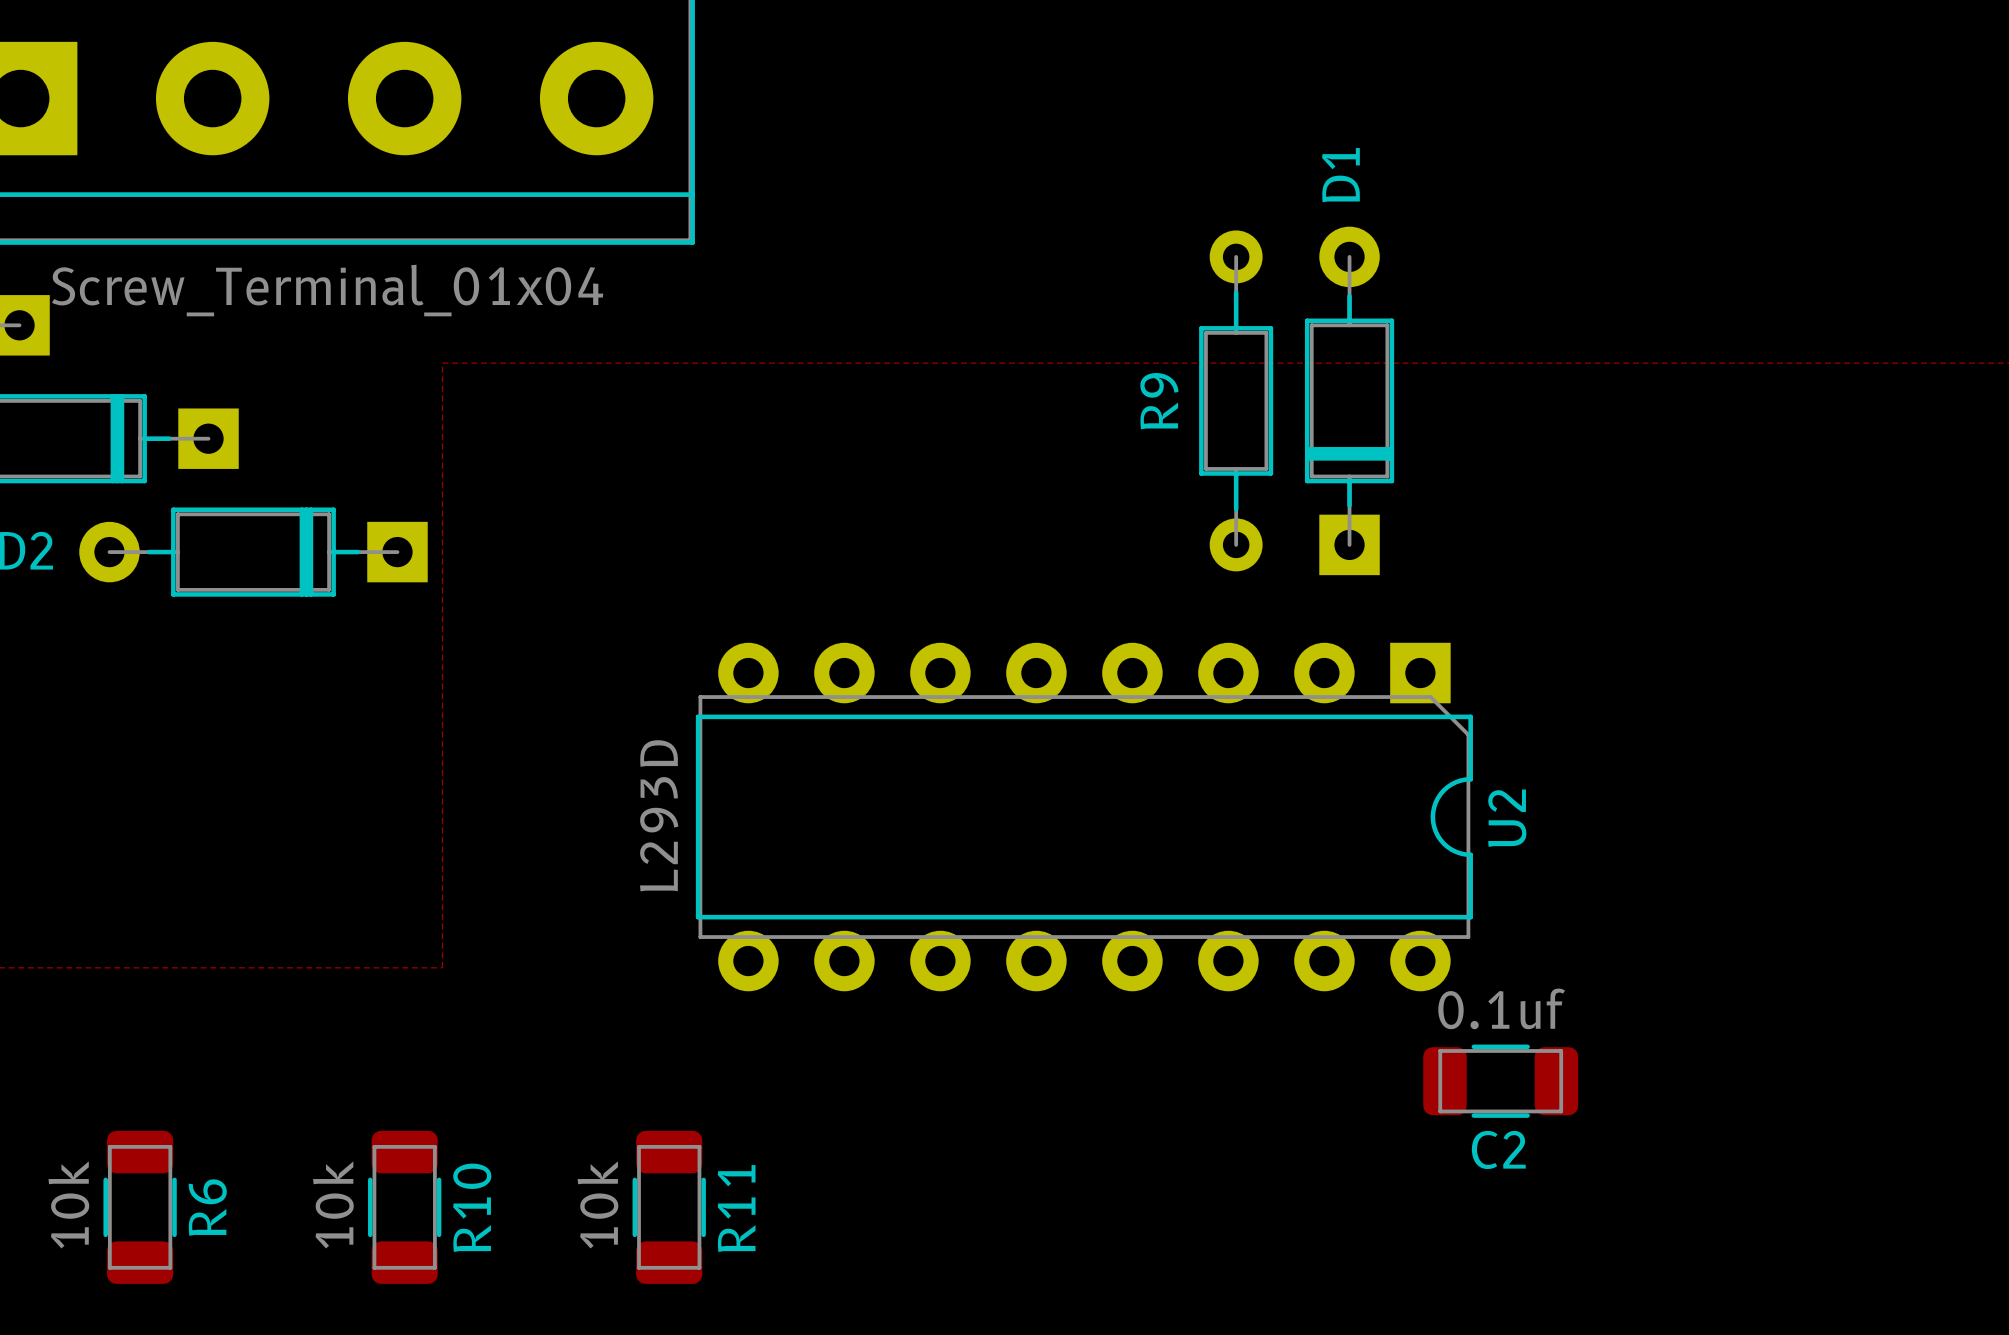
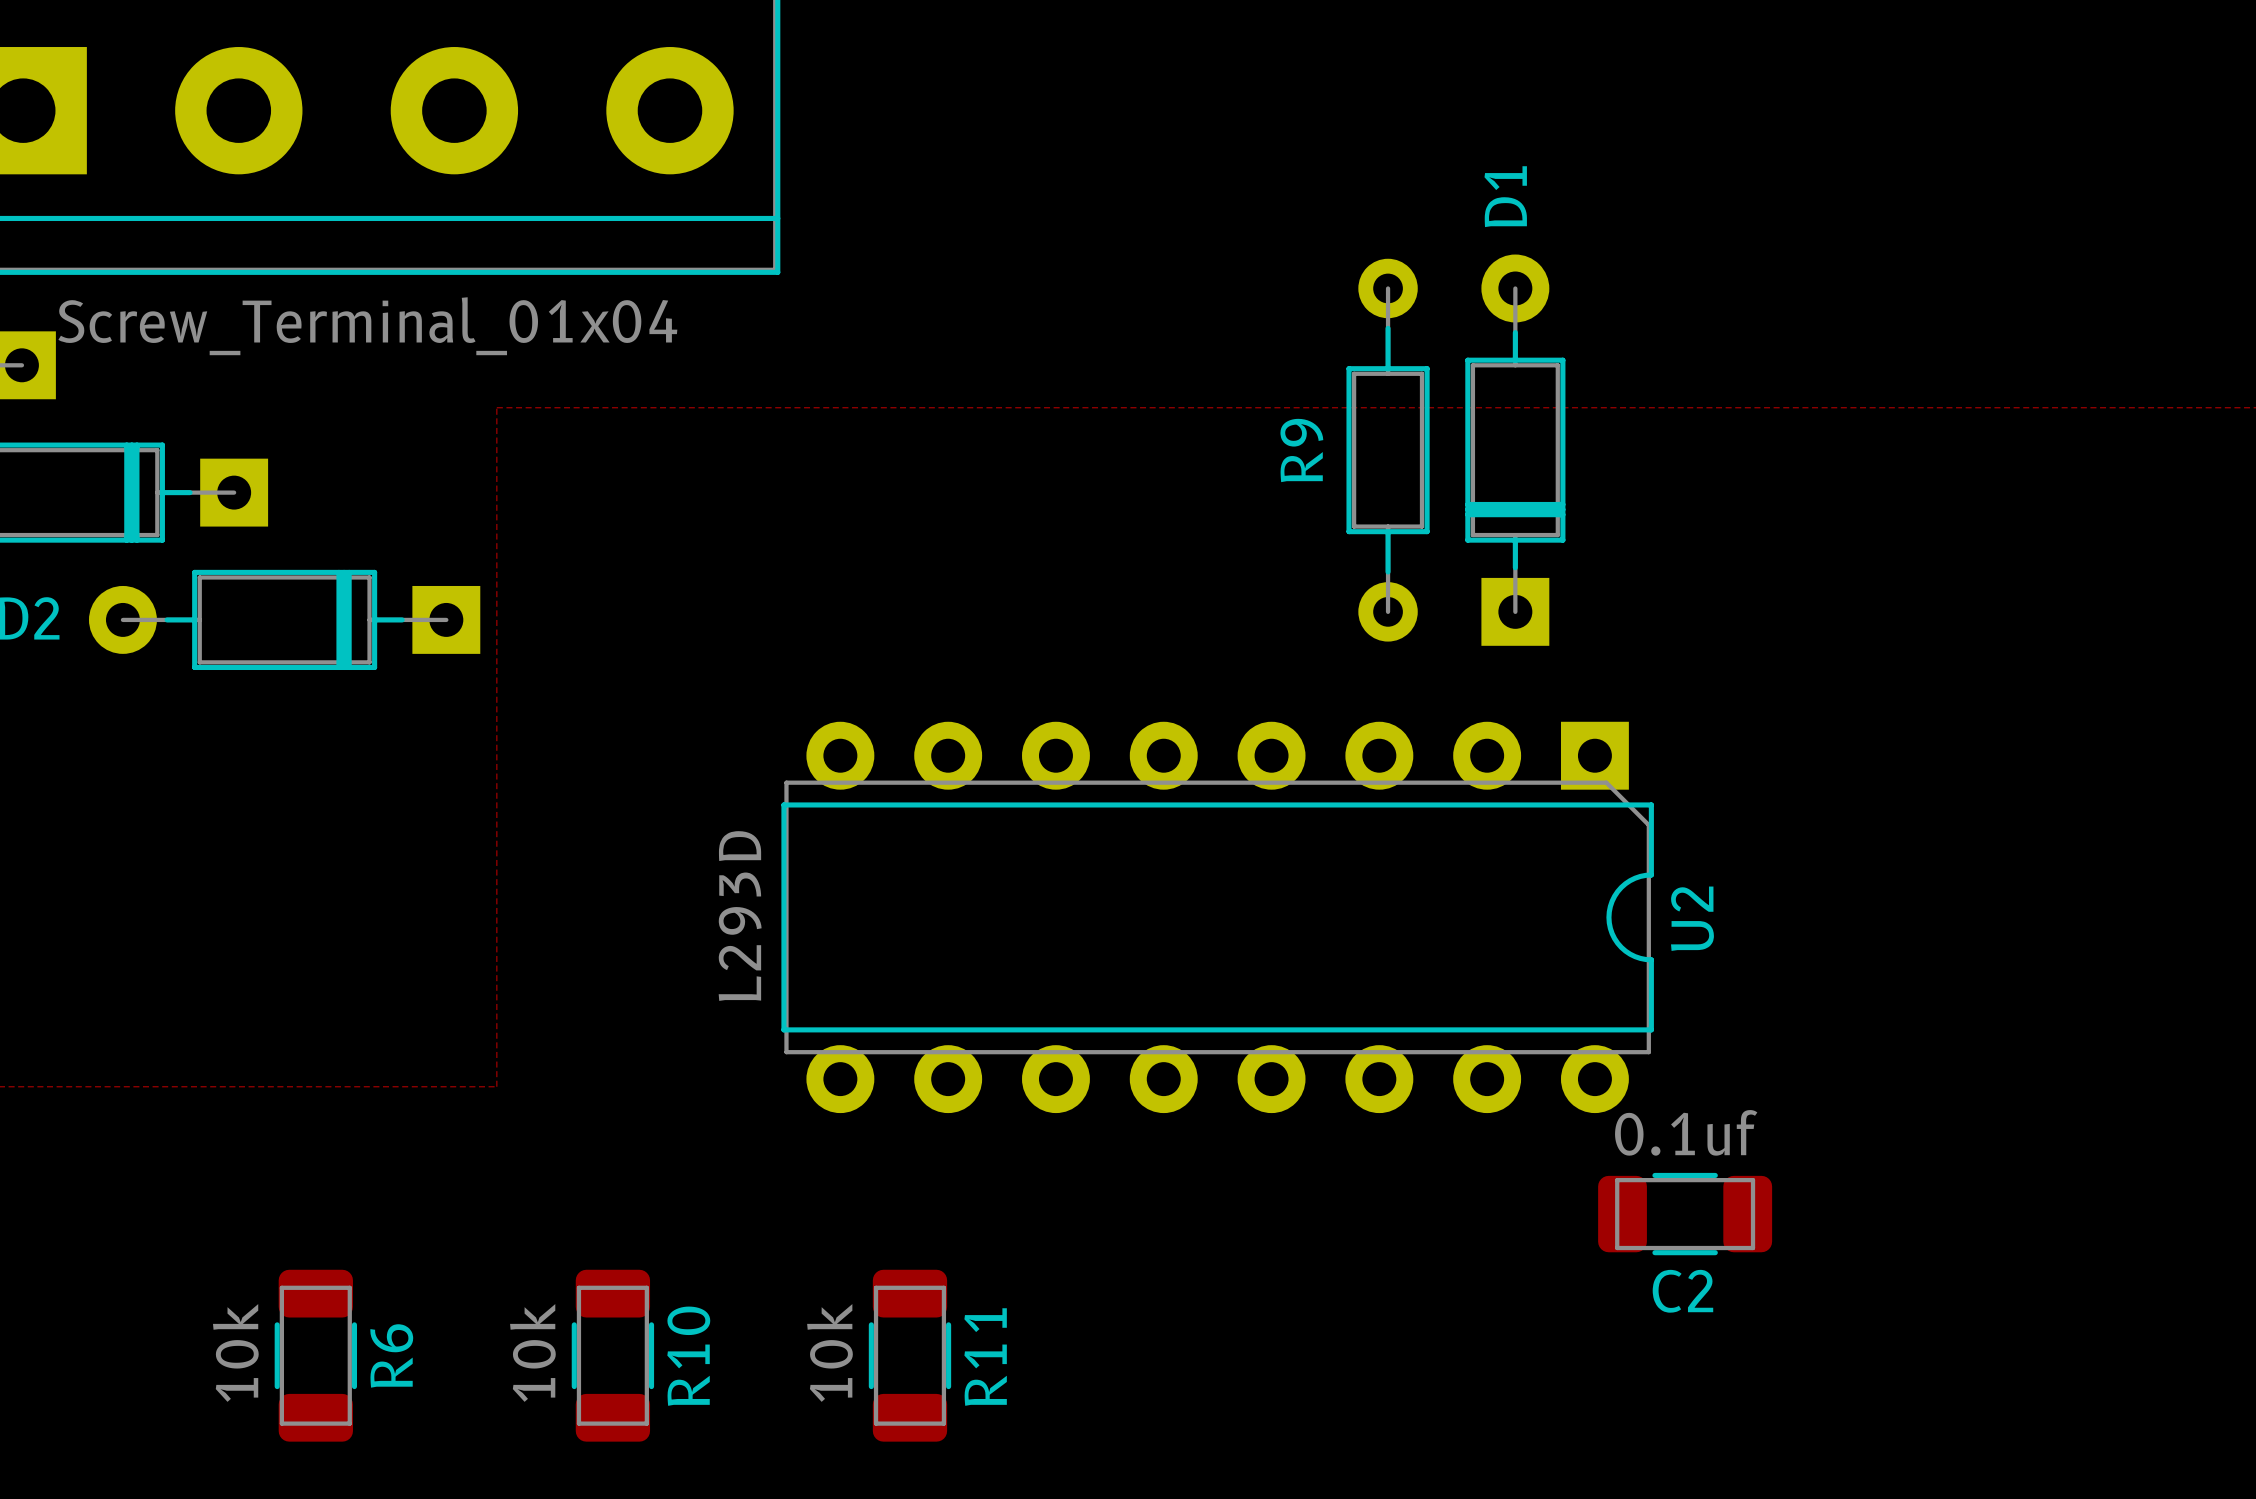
R6 position: (140, 1207) -> (315, 1355)
R10 position: (404, 1207) -> (612, 1355)
R11 position: (669, 1207) -> (909, 1355)

